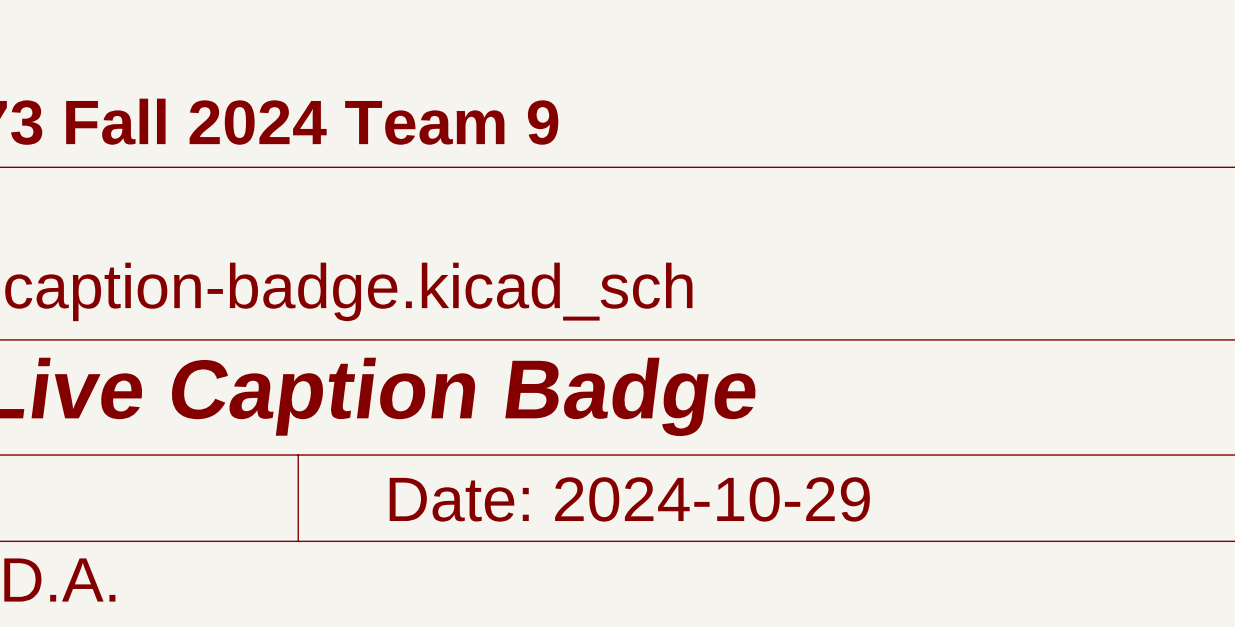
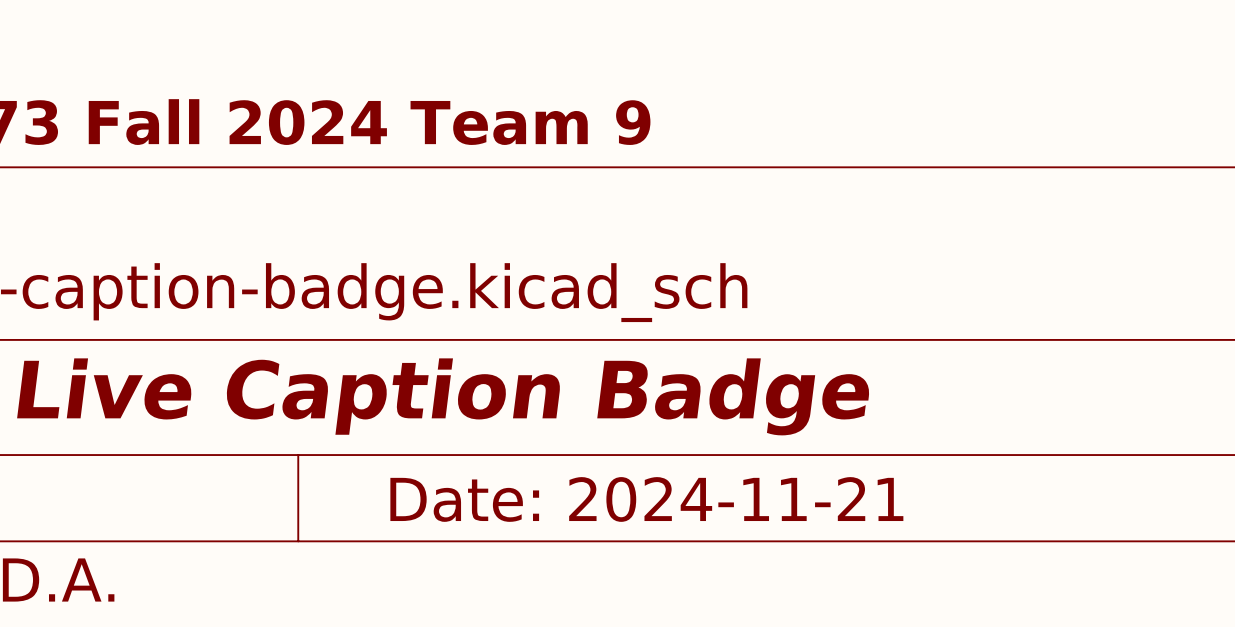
title block: Date: 2024-10-29 (629, 499) -> Date: 2024-11-21 (646, 499)

